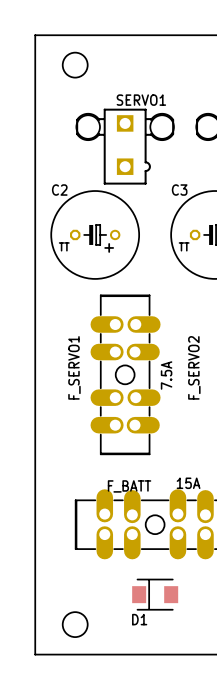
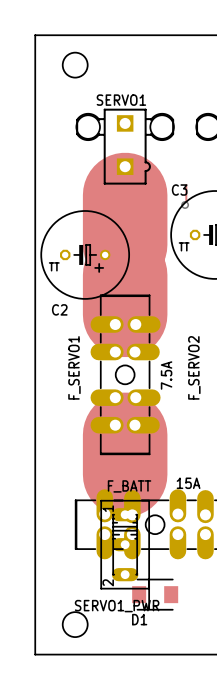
SERVO1 name position: SERVO1 (141, 100) -> SERVO1 (121, 100)
top track: none -> (165, 185) (155, 185) (145, 195) (125, 195) (125, 244) (115, 254) (105, 254)
top track: none -> (186, 185) (185, 205)
C2 name position: C2 (59, 190) -> C2 (59, 309)
via: none -> (185, 205)
C2 position: (95, 234) -> (85, 254)
top track: none -> (125, 274) (125, 314)
top track: none -> (125, 434) (125, 474)
SERVO1_PWR: none -> (125, 544)

